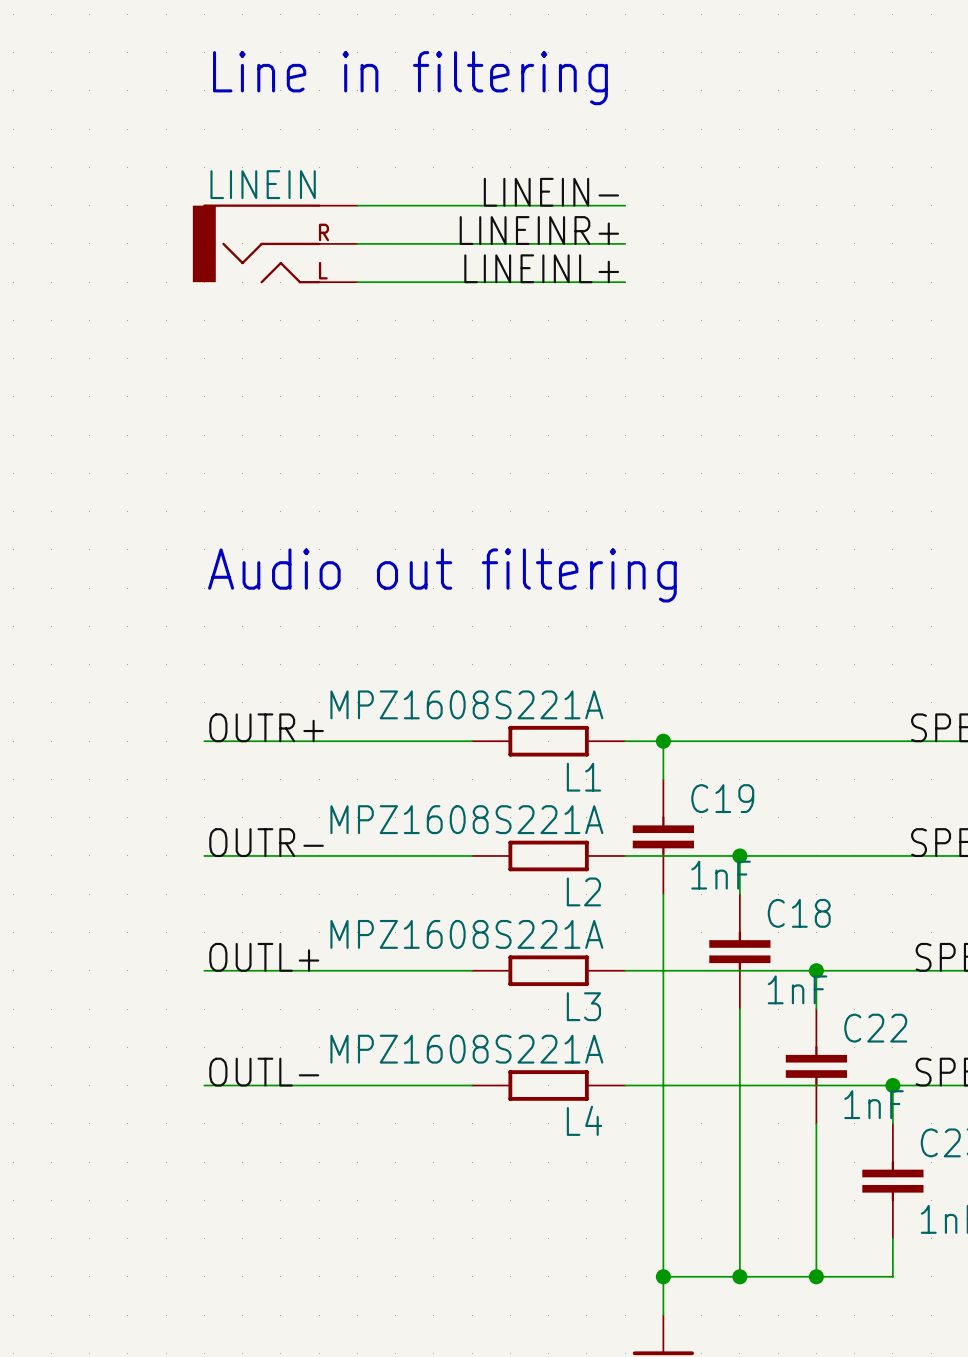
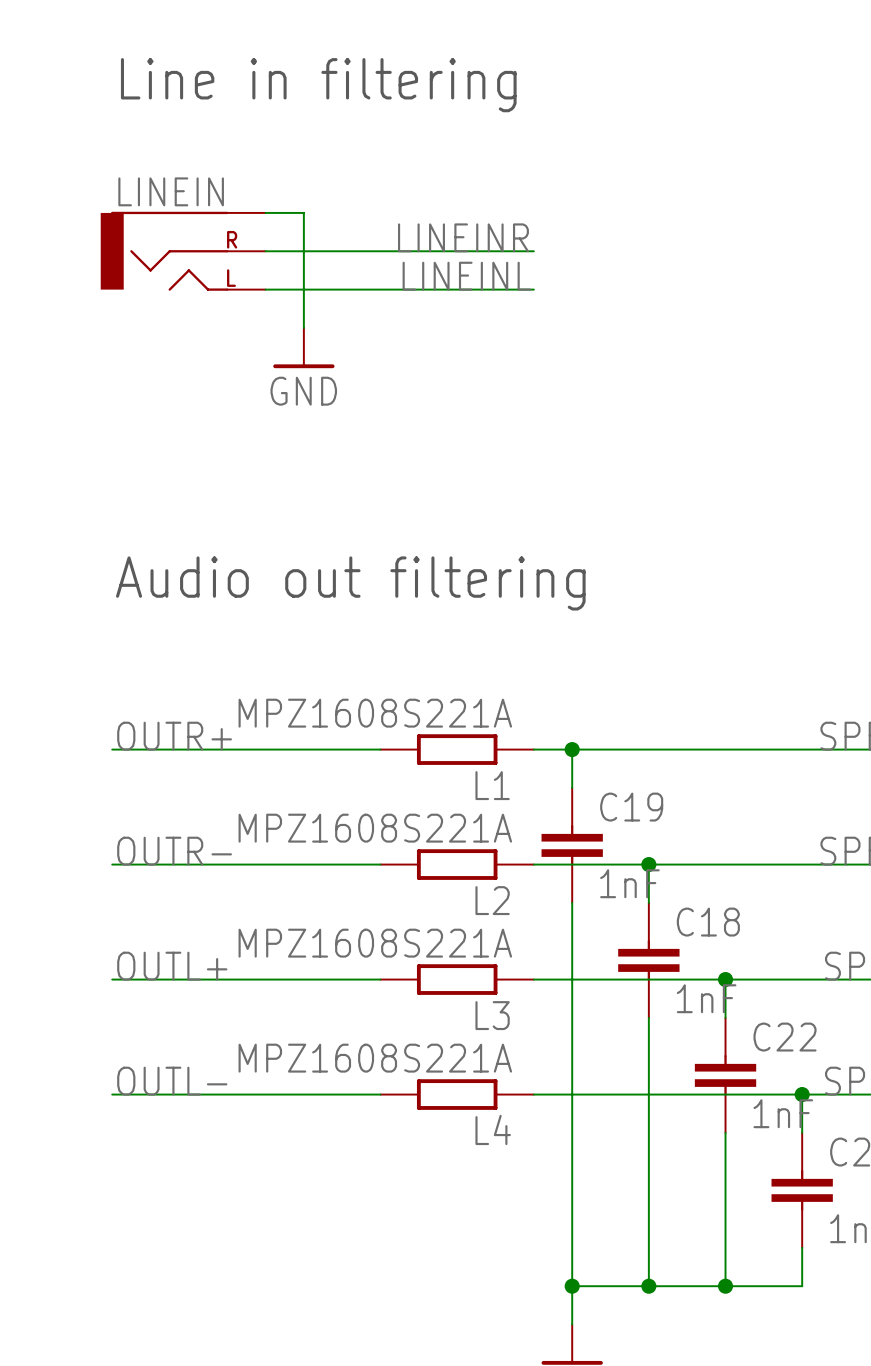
label: LINEIN- (551, 192) -> none
wire: (395, 205) (625, 205) -> (303, 212) (303, 327)
label: LINEINR+ (539, 230) -> LINEINR (463, 237)
label: LINEINL+ (541, 268) -> LINEINL (466, 276)
power symbol: none -> GND (303, 348)

